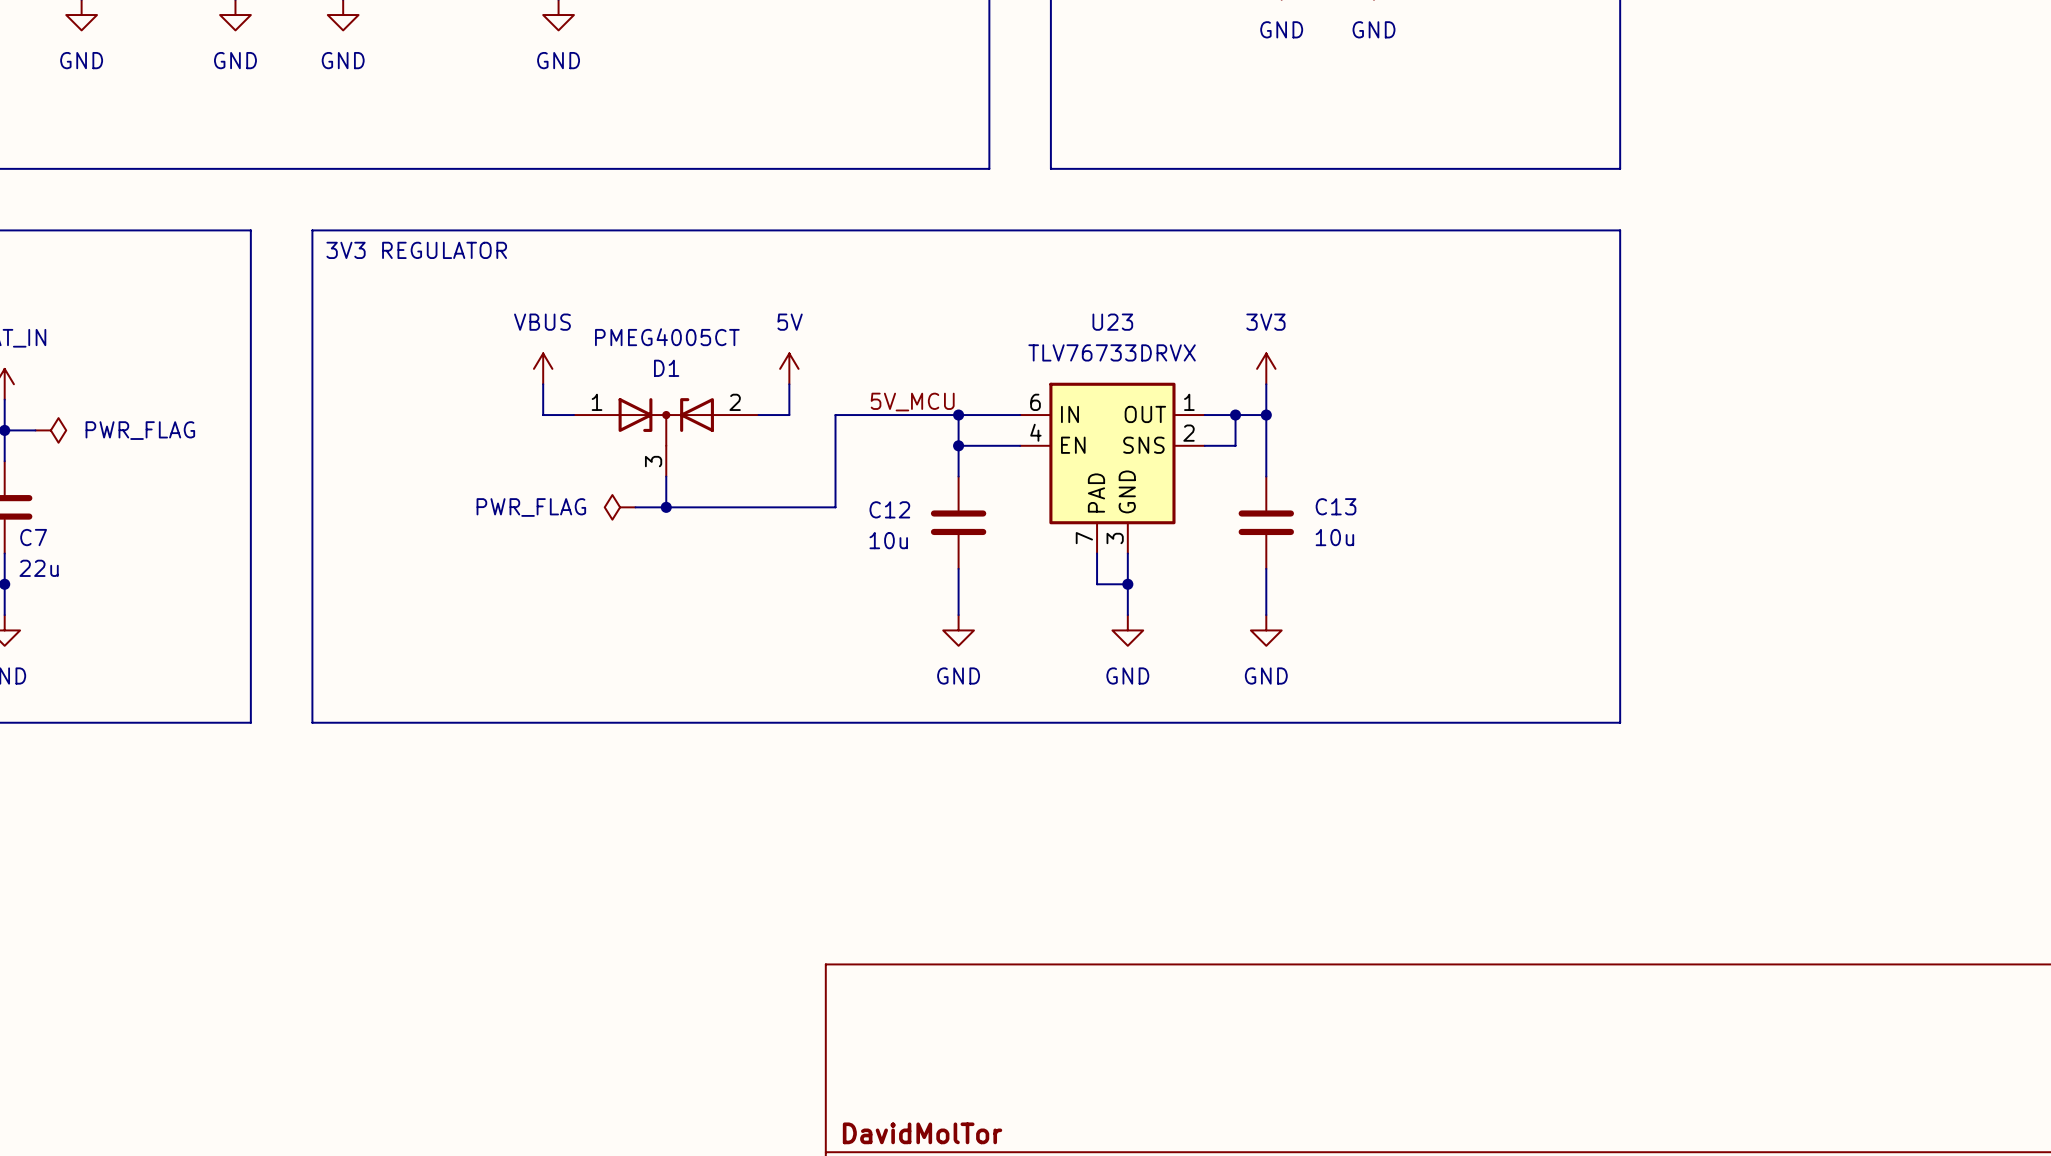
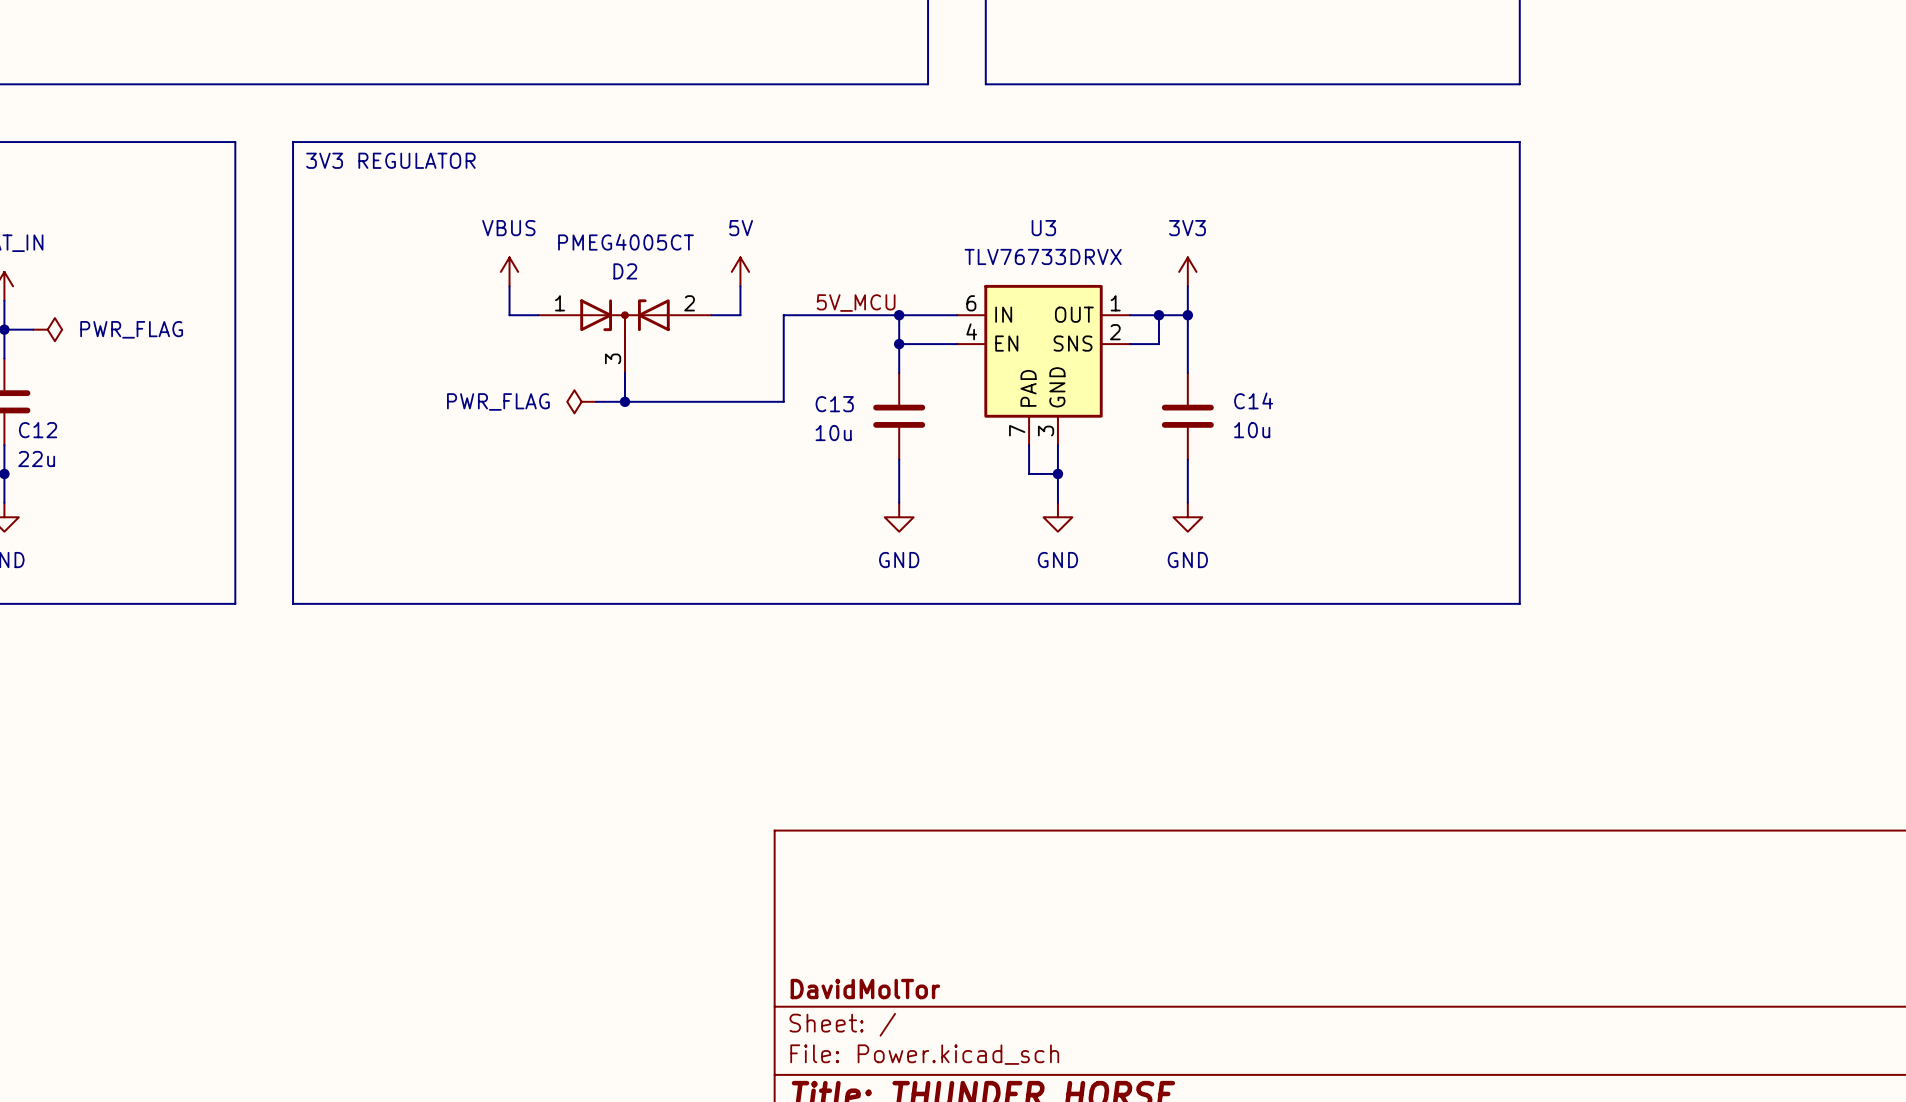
U23 name: U23 (1112, 322) -> U3 (1043, 228)
D1 name: D1 (666, 368) -> D2 (625, 271)
C13 name: C13 (1336, 506) -> C14 (1253, 400)
C12 name: C12 (889, 509) -> C13 (834, 404)
C7 name: C7 (33, 537) -> C12 (38, 430)

